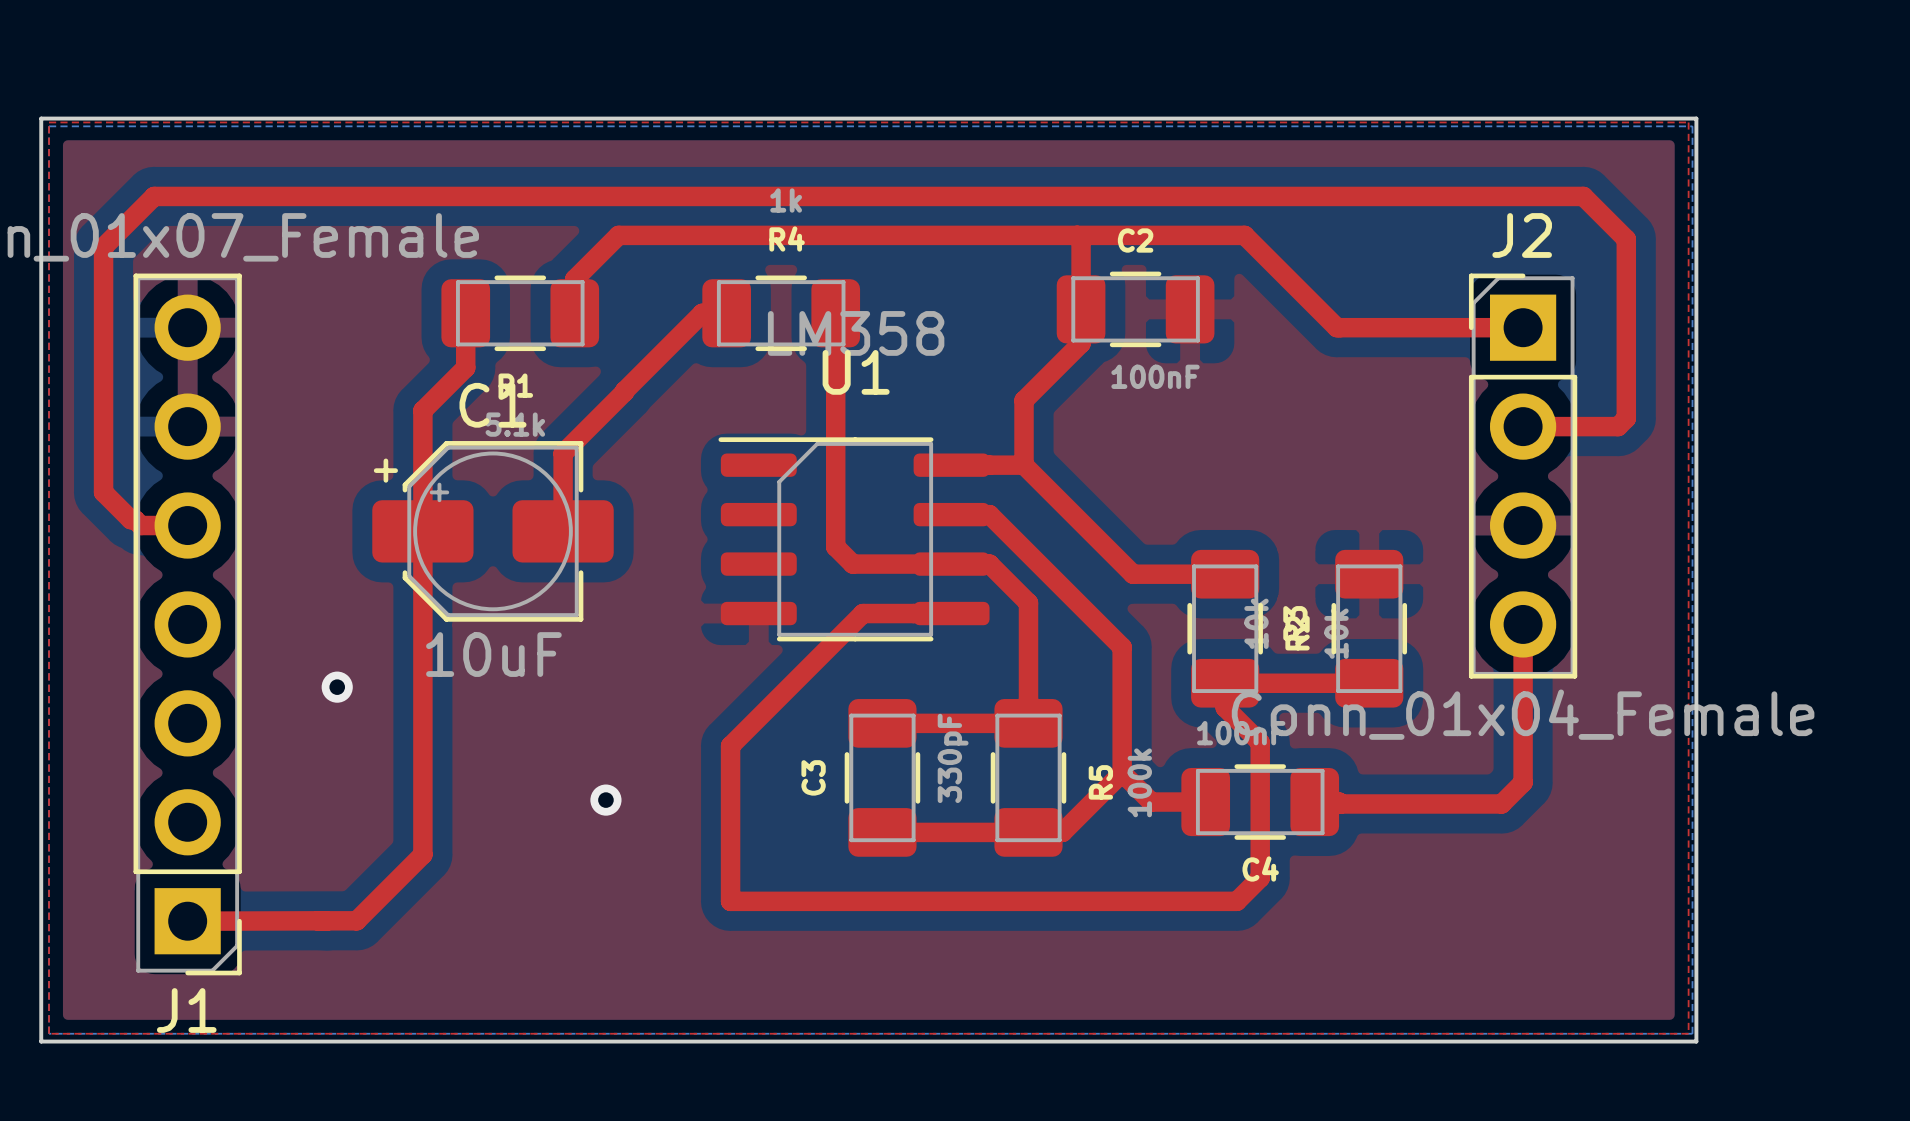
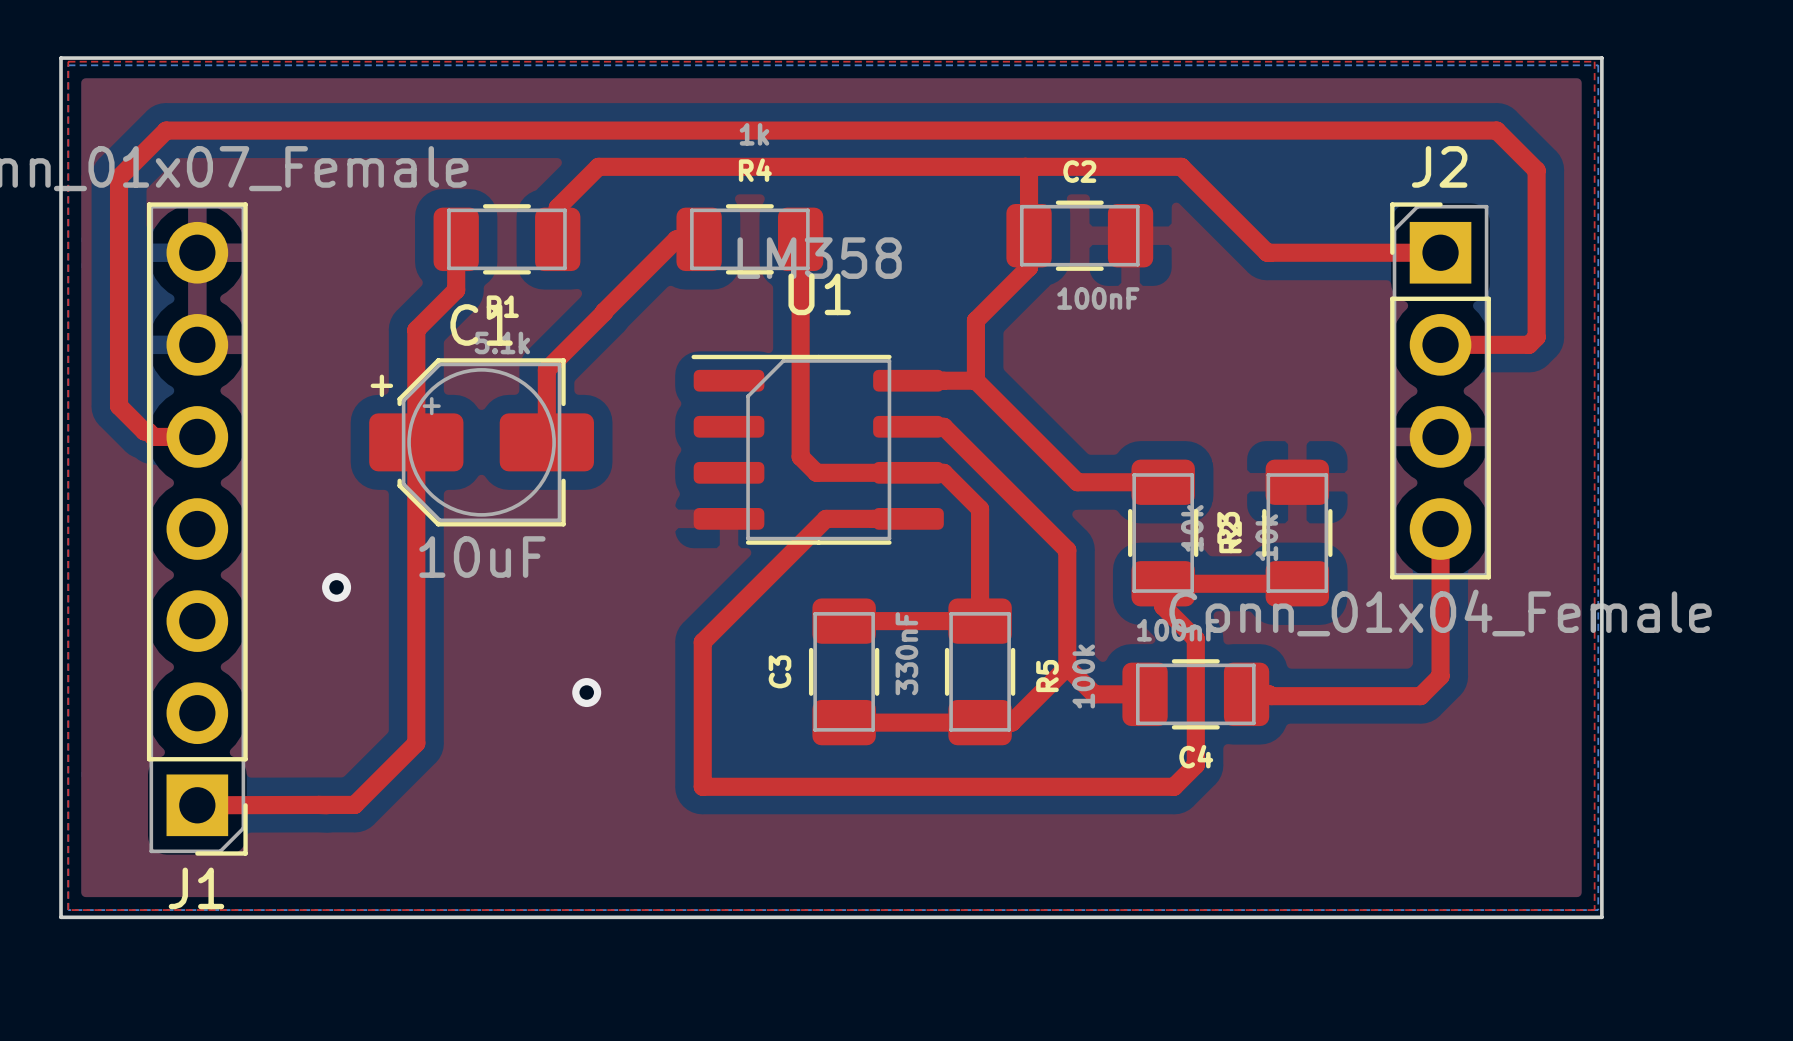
C3 value: 330pF (953, 758) -> 330nF (906, 653)

